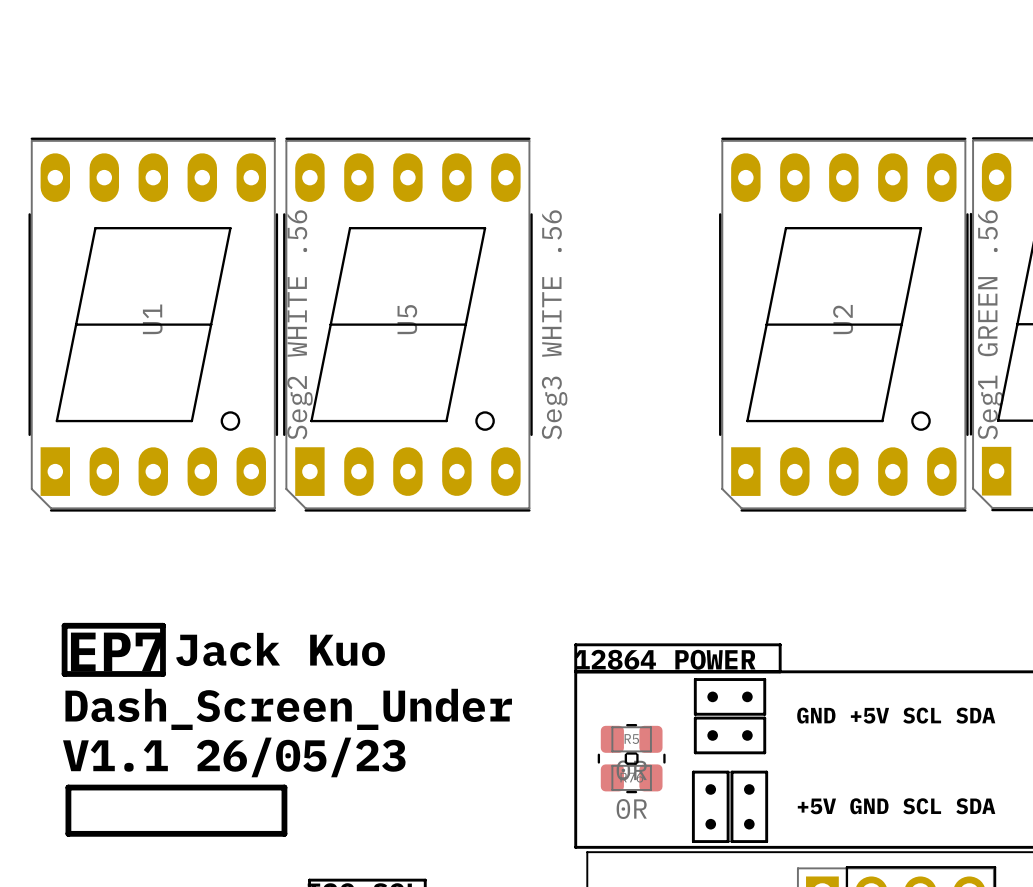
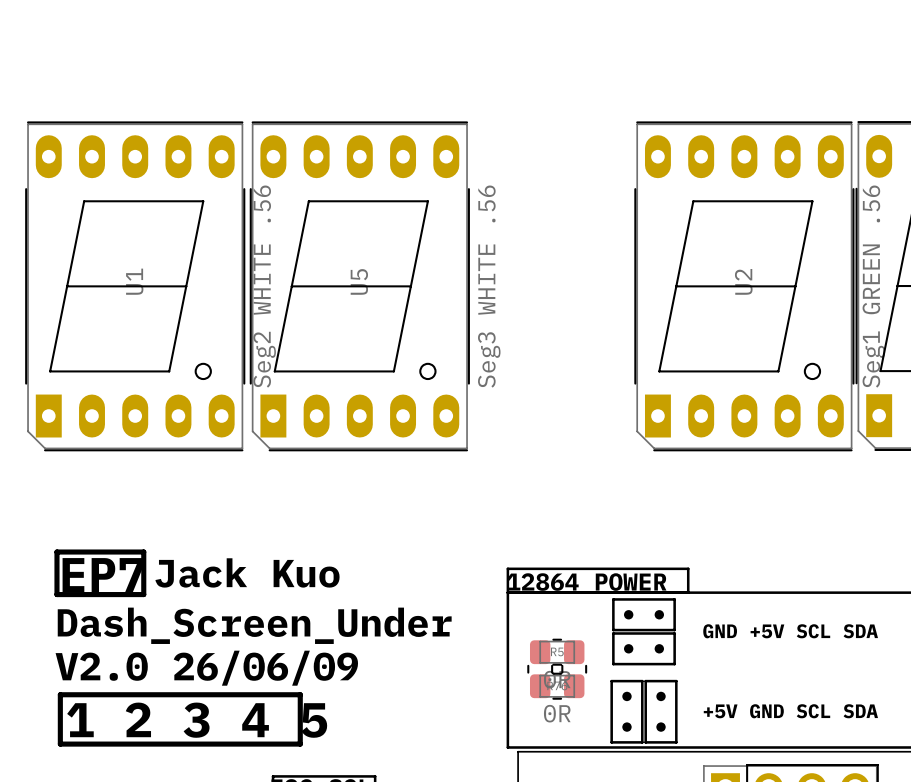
text: V1.1 26/05/23 (234, 757) -> V2.0 26/06/09 (206, 668)
line: (284, 787) (284, 833) (68, 833) -> (250, 694) (300, 694) (300, 744) (60, 744) (60, 735)
text: none -> 1 2 3 4 5 (197, 720)

